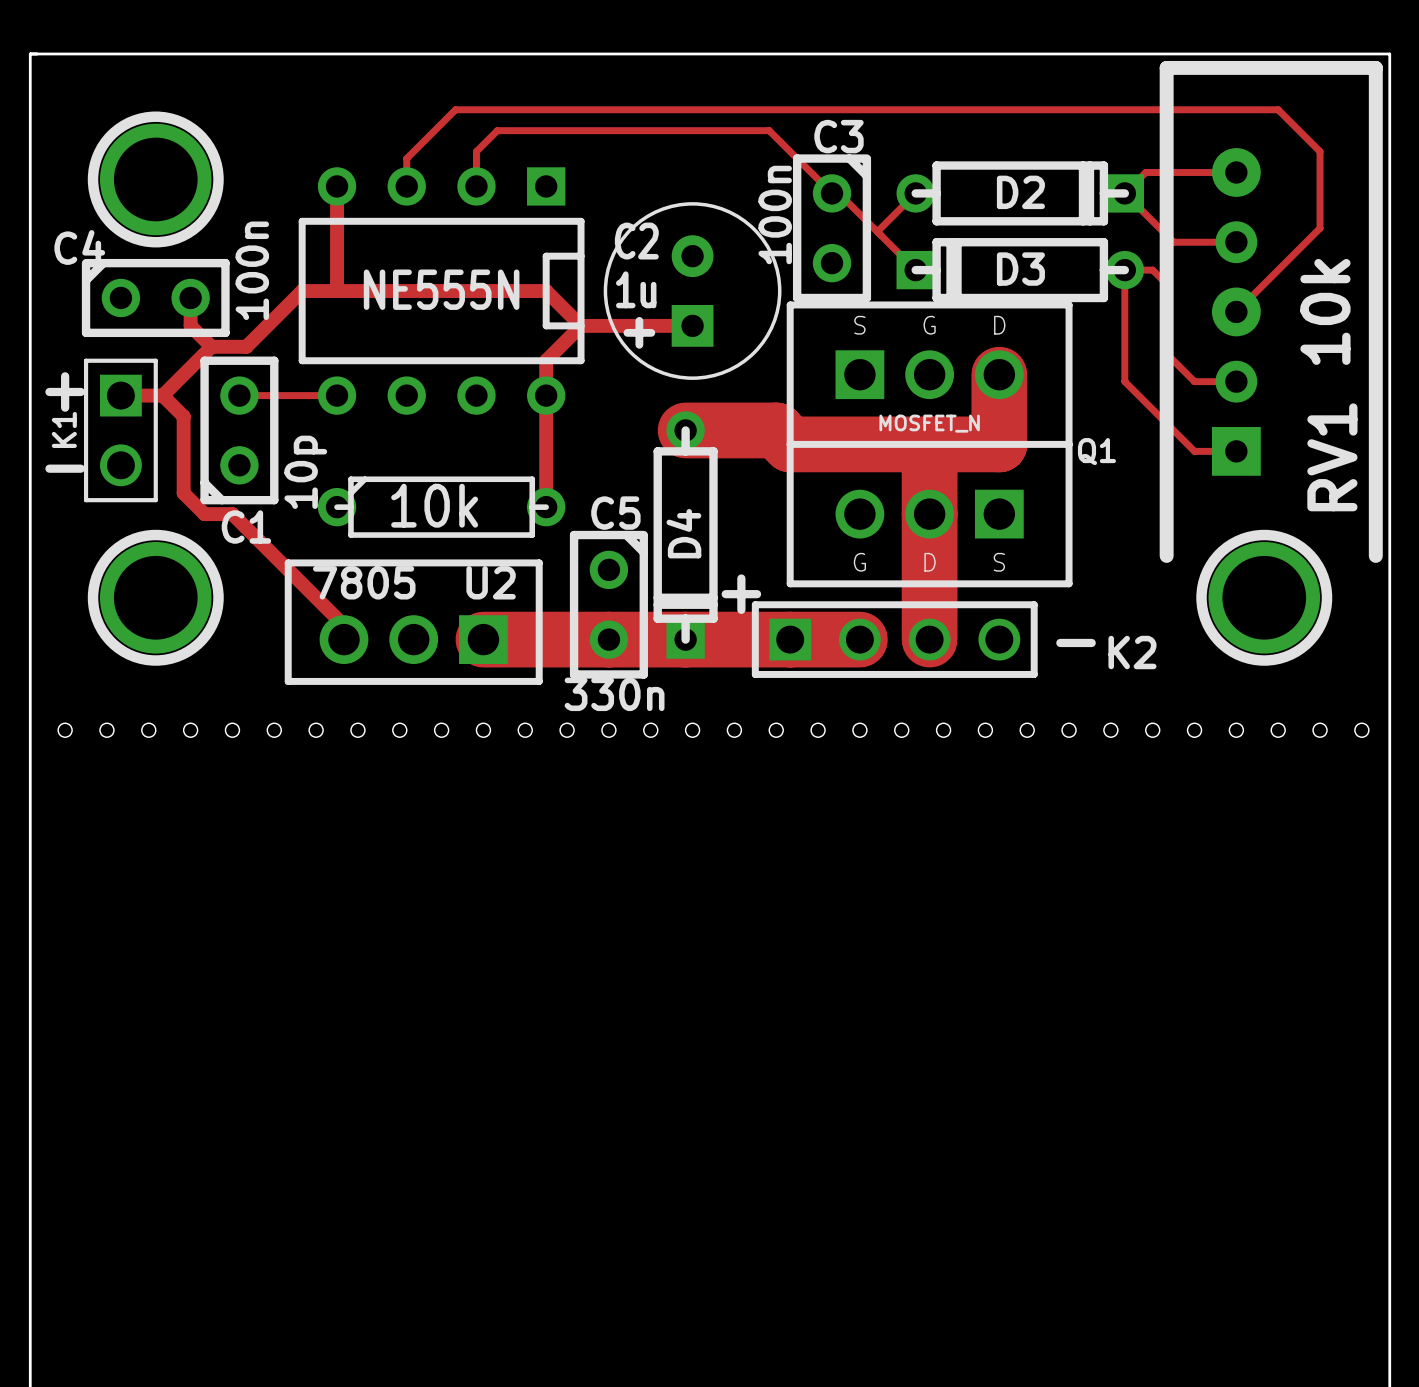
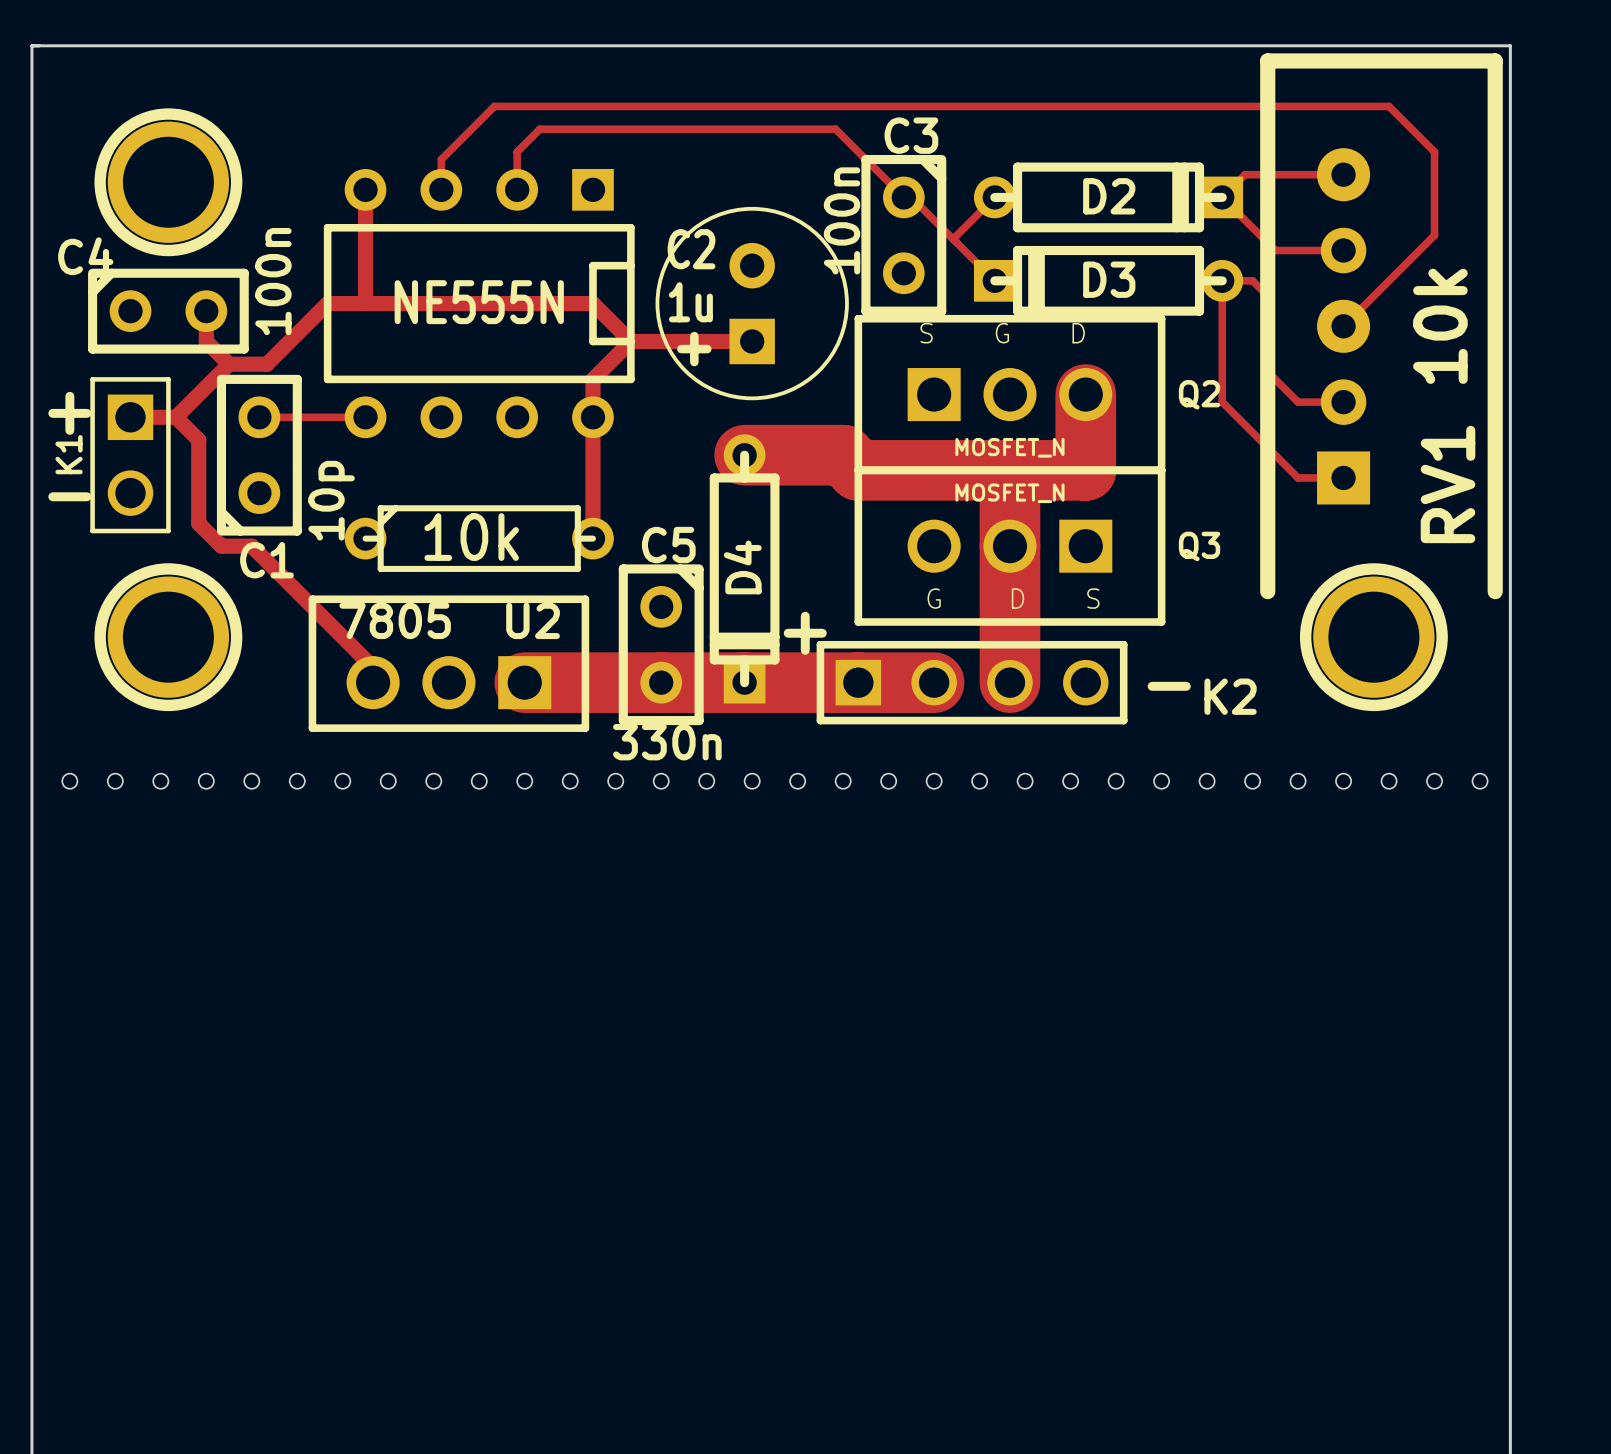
Q2: none -> MOSFET_N (1009, 394)
Q1: MOSFET_N (929, 444) -> none
Q3: none -> MOSFET_N (1009, 546)

